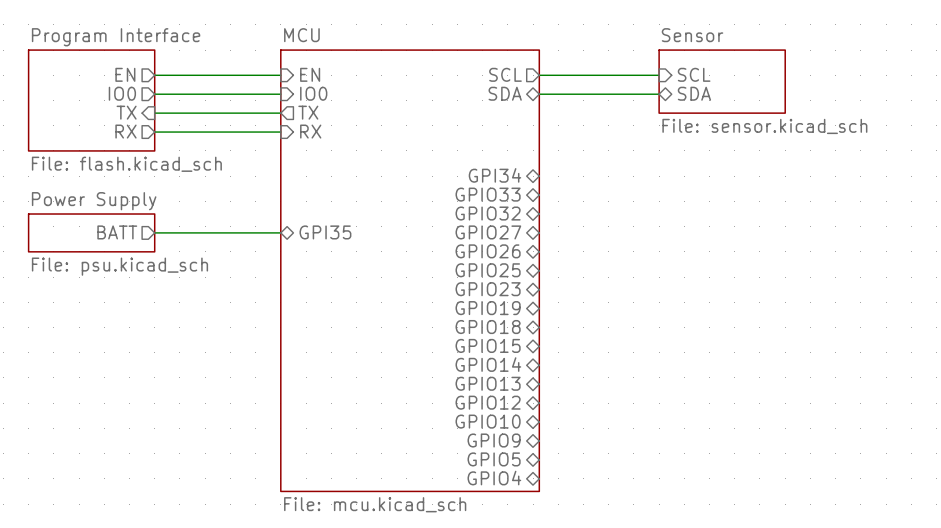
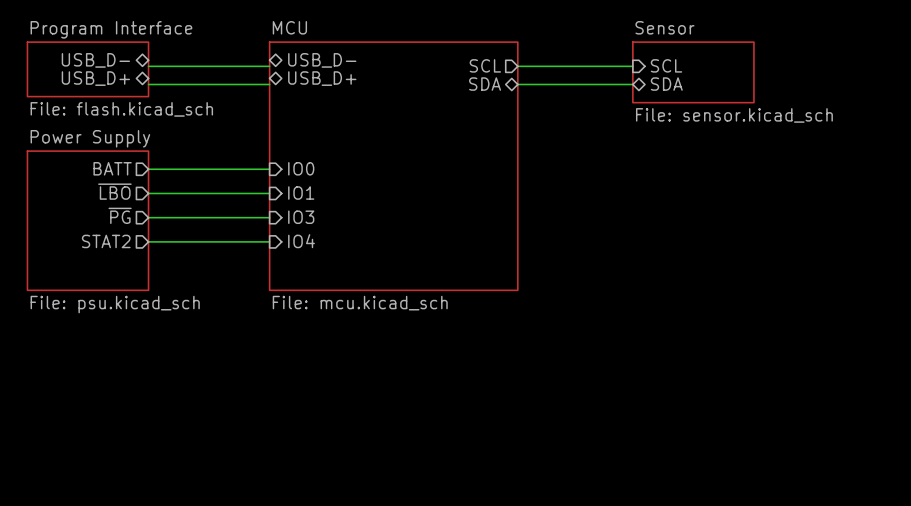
sheet pin: none -> USB_D- (95, 60)
sheet pin: none -> USB_D- (322, 60)
sheet pin: EN (125, 74) -> none
sheet pin: EN (310, 74) -> none
sheet Program Interface: none -> File: flash.kicad_sch (87, 69)
sheet pin: none -> USB_D+ (95, 78)
sheet pin: none -> USB_D+ (322, 78)
sheet pin: IO0 (122, 93) -> none
sheet pin position: IO0 (313, 93) -> IO0 (301, 168)
sheet Program Interface: File: flash.kicad_sch (91, 100) -> none
sheet pin: TX (126, 112) -> none
sheet pin: TX (308, 112) -> none
wire: (154, 113) (280, 113) -> (148, 193) (269, 193)
sheet pin: RX (125, 131) -> none
sheet pin: RX (310, 131) -> none
wire: (154, 132) (280, 132) -> (148, 169) (269, 169)
sheet pin: GPI34 (494, 175) -> none
sheet MCU: none -> File: mcu.kicad_sch (393, 166)
sheet pin: none -> BATT (112, 168)
sheet pin: GPIO33 (488, 194) -> none
sheet Power Supply name position: Power Supply (94, 201) -> Power Supply (90, 138)
sheet pin: none -> ~{LBO} (114, 191)
sheet pin: none -> IO1 (301, 193)
sheet Power Supply shape: [27, 213, 156, 253] -> [26, 150, 150, 292]
sheet pin: GPIO32 (488, 213) -> none
sheet pin: BATT (117, 232) -> ~{PG} (120, 215)
sheet pin shape: bidirectional (325, 232) -> input (301, 217)
sheet pin: GPI35 (325, 232) -> IO3 (301, 217)
sheet pin: GPIO27 (488, 232) -> none
sheet pin: GPIO26 (488, 251) -> none
sheet pin: none -> STAT2 (106, 241)
sheet pin: none -> IO4 (301, 241)
wire: none -> (148, 241) (269, 241)
sheet Power Supply value position: File: psu.kicad_sch (119, 266) -> File: psu.kicad_sch (115, 304)
sheet MCU: File: mcu.kicad_sch (410, 270) -> none
sheet pin: GPIO25 (488, 270) -> none
sheet pin: GPIO23 (488, 289) -> none
sheet pin: GPIO19 (488, 308) -> none
sheet pin: GPIO18 (488, 327) -> none
sheet pin: GPIO15 (488, 345) -> none
sheet pin: GPIO14 (488, 364) -> none
sheet pin: GPIO13 (488, 383) -> none
sheet pin: GPIO12 (488, 402) -> none
sheet pin: GPIO10 (488, 421) -> none
sheet pin: GPIO9 (494, 440) -> none
sheet pin: GPIO5 (494, 459) -> none
sheet pin: GPIO4 (494, 478) -> none

